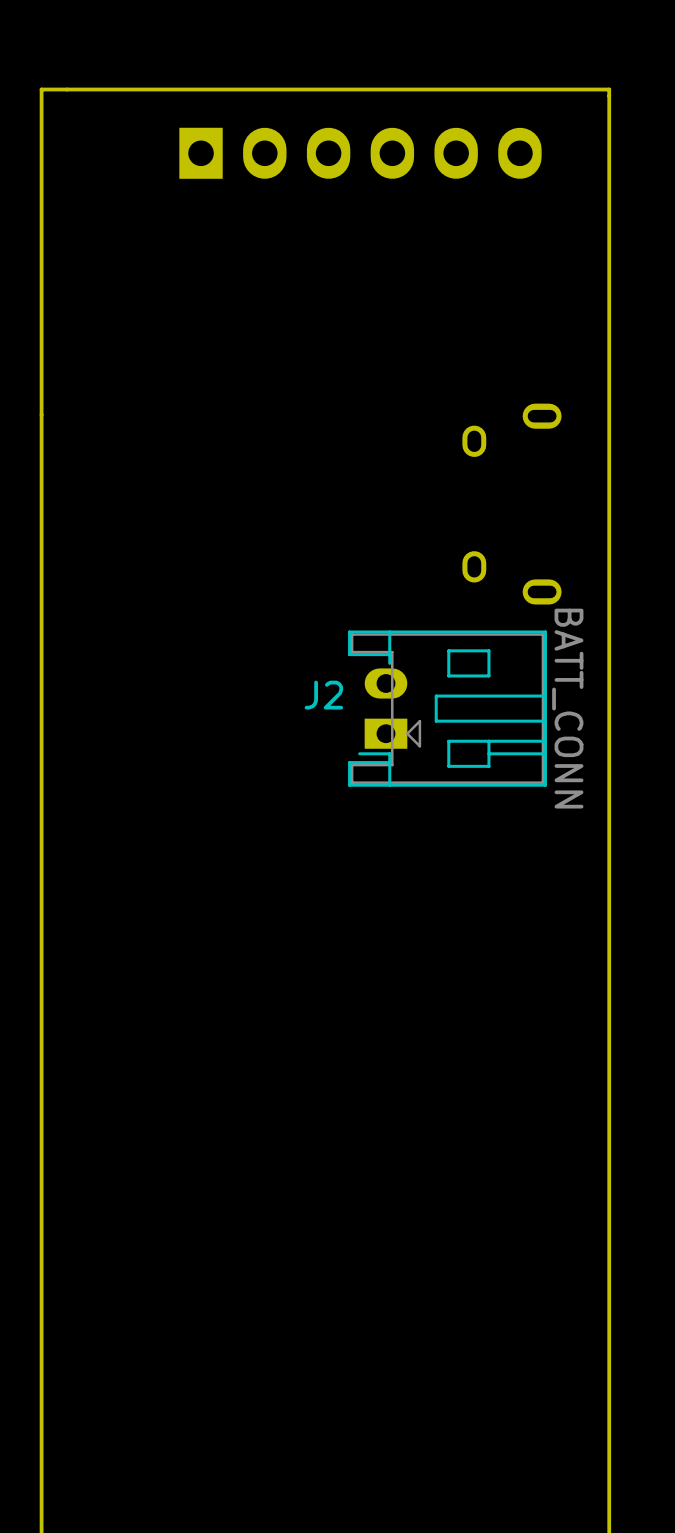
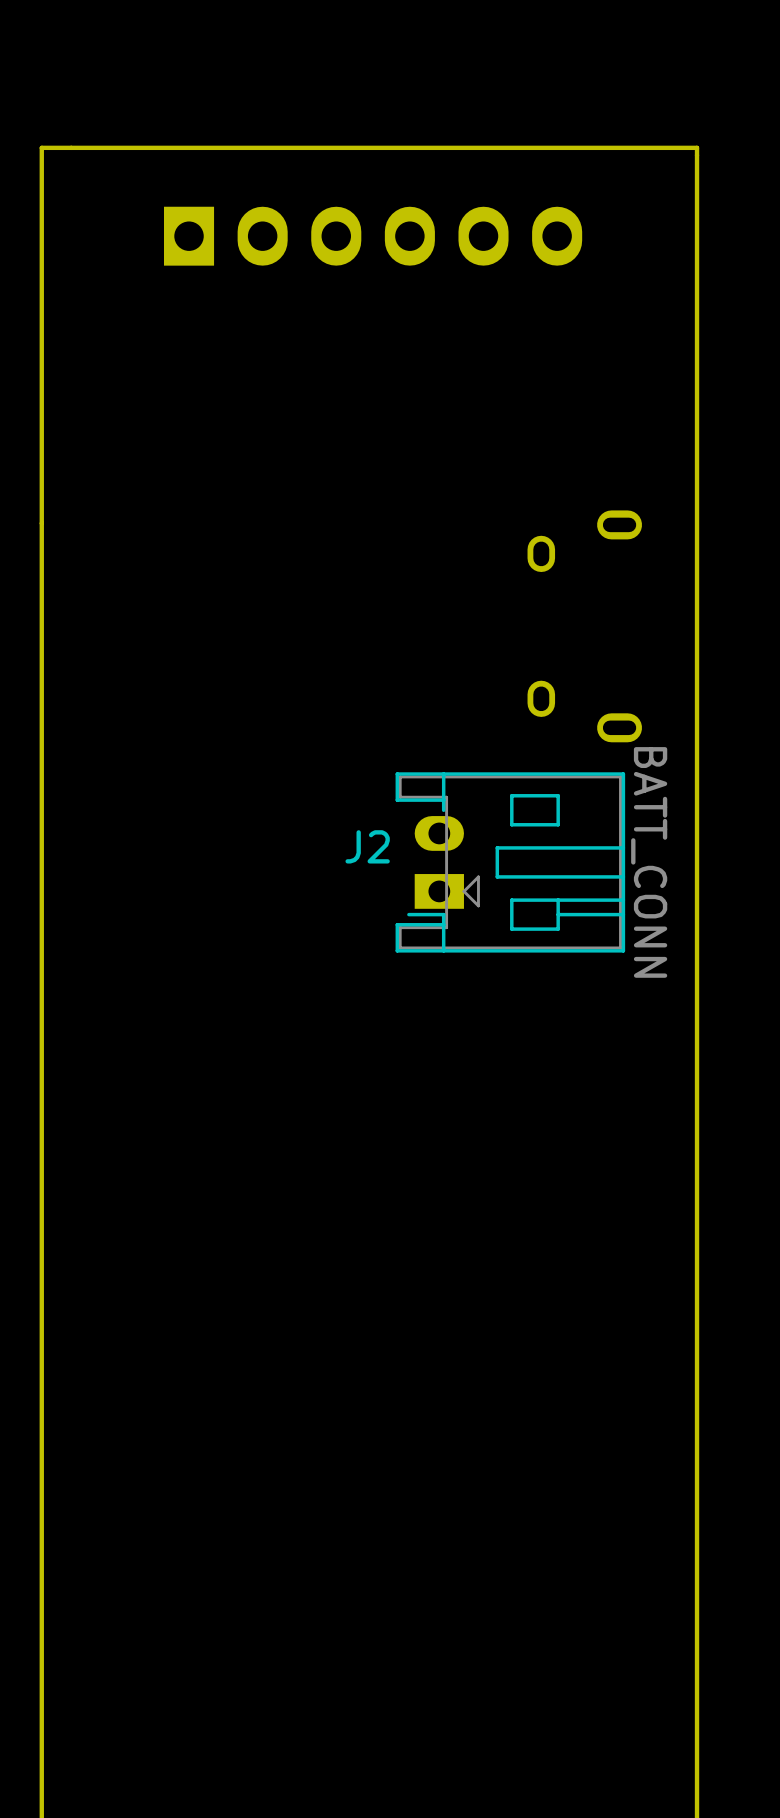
part position: (360, 153) -> (373, 236)

